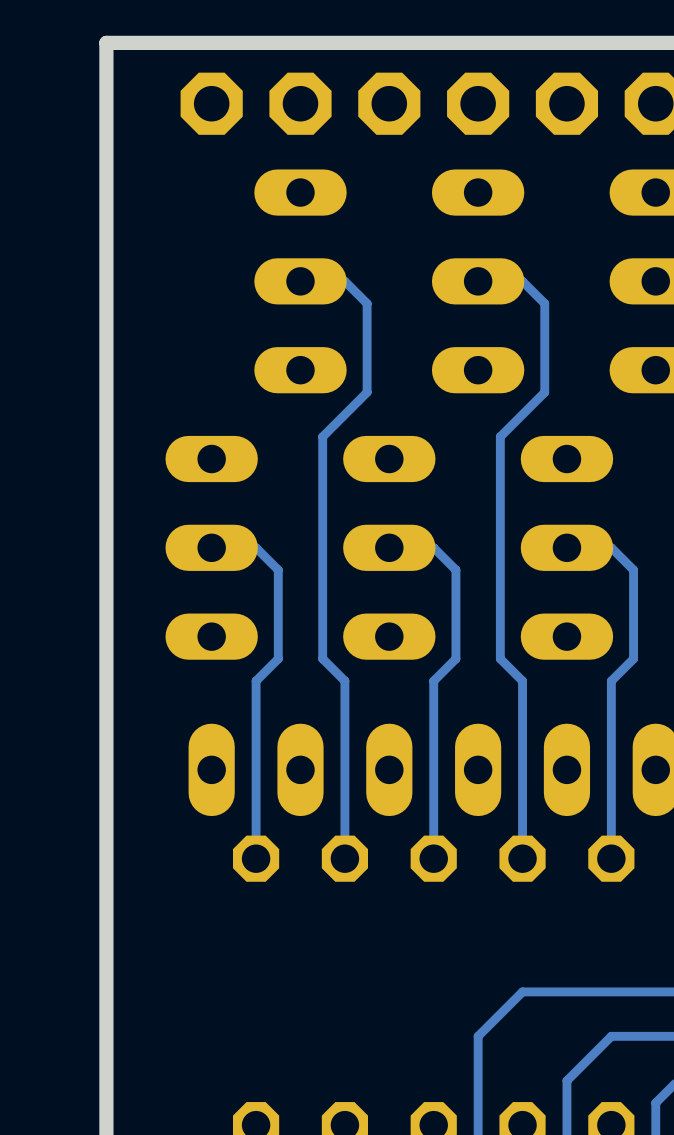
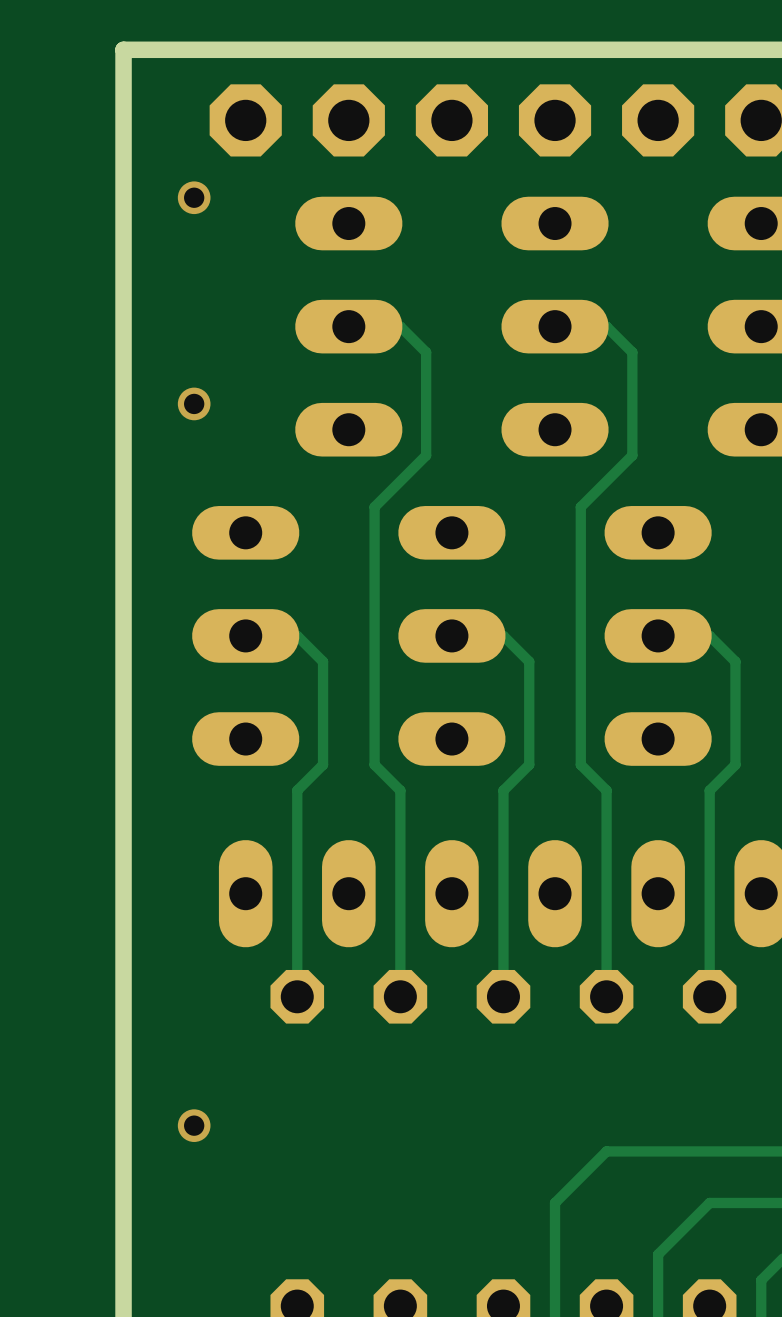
via: none -> (194, 197)
via: none -> (194, 403)
via: none -> (194, 1125)

